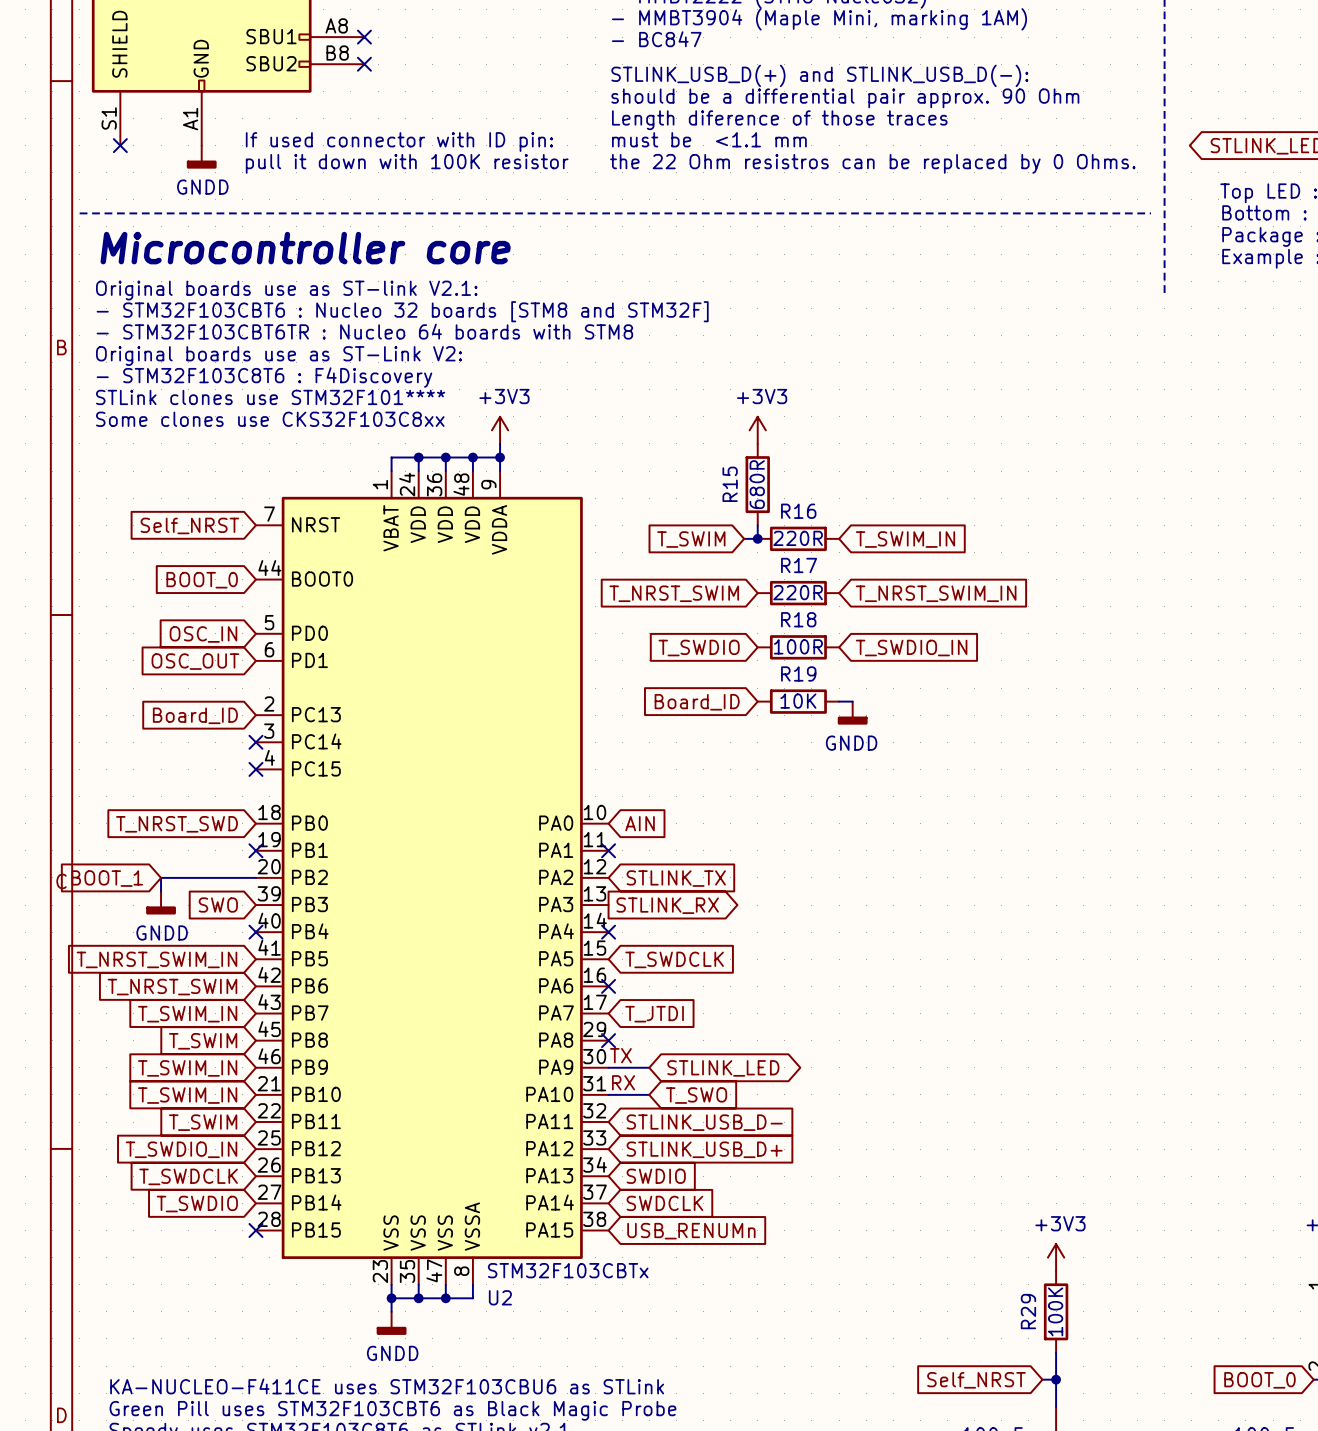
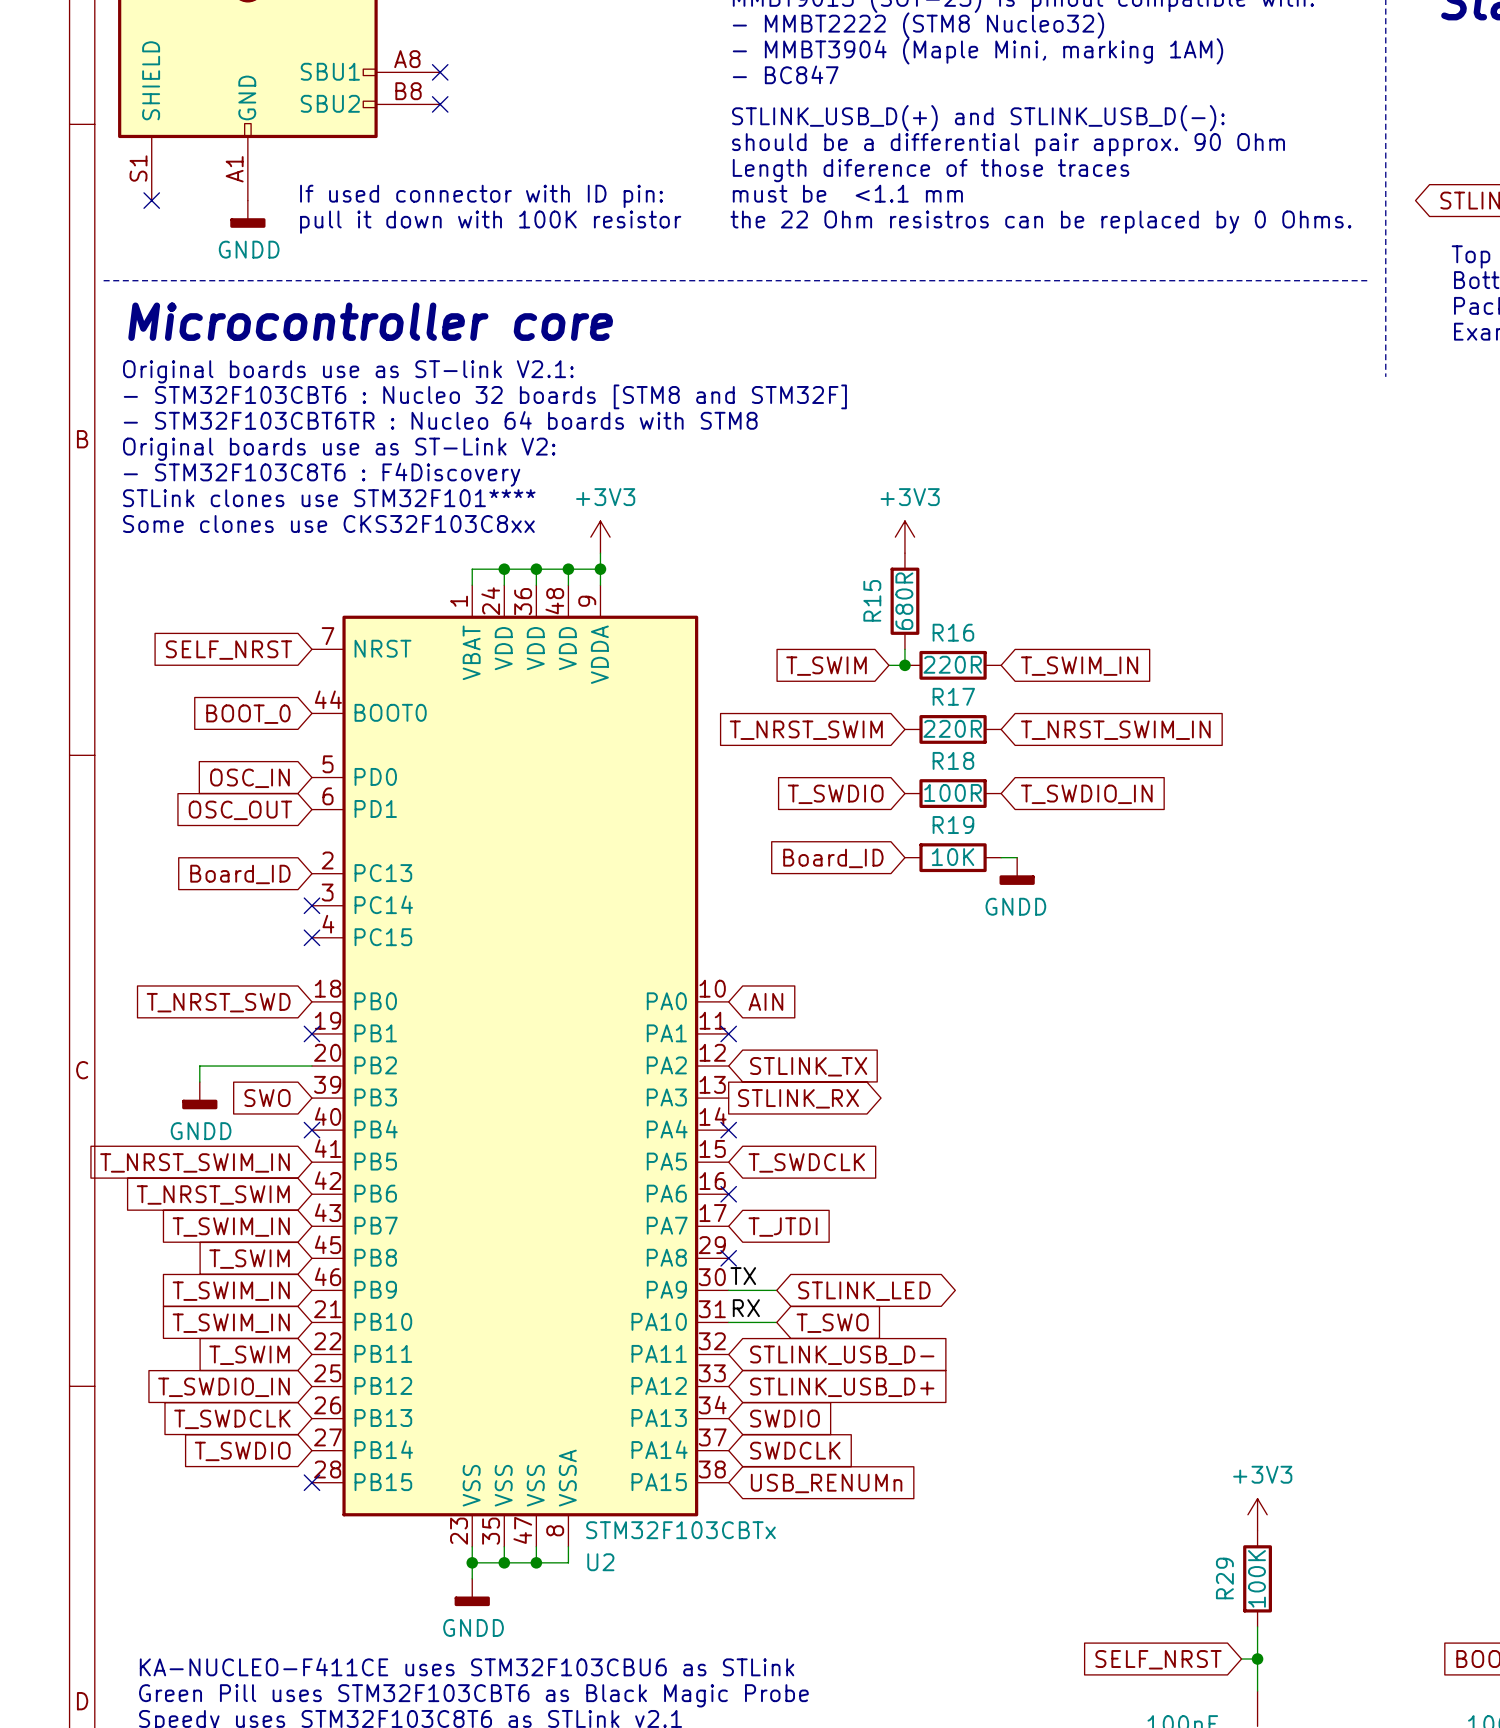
global label: Self_NRST (189, 525) -> SELF_NRST (228, 650)
global label: BOOT_1 (107, 878) -> none
global label: Self_NRST (976, 1380) -> SELF_NRST (1158, 1659)

